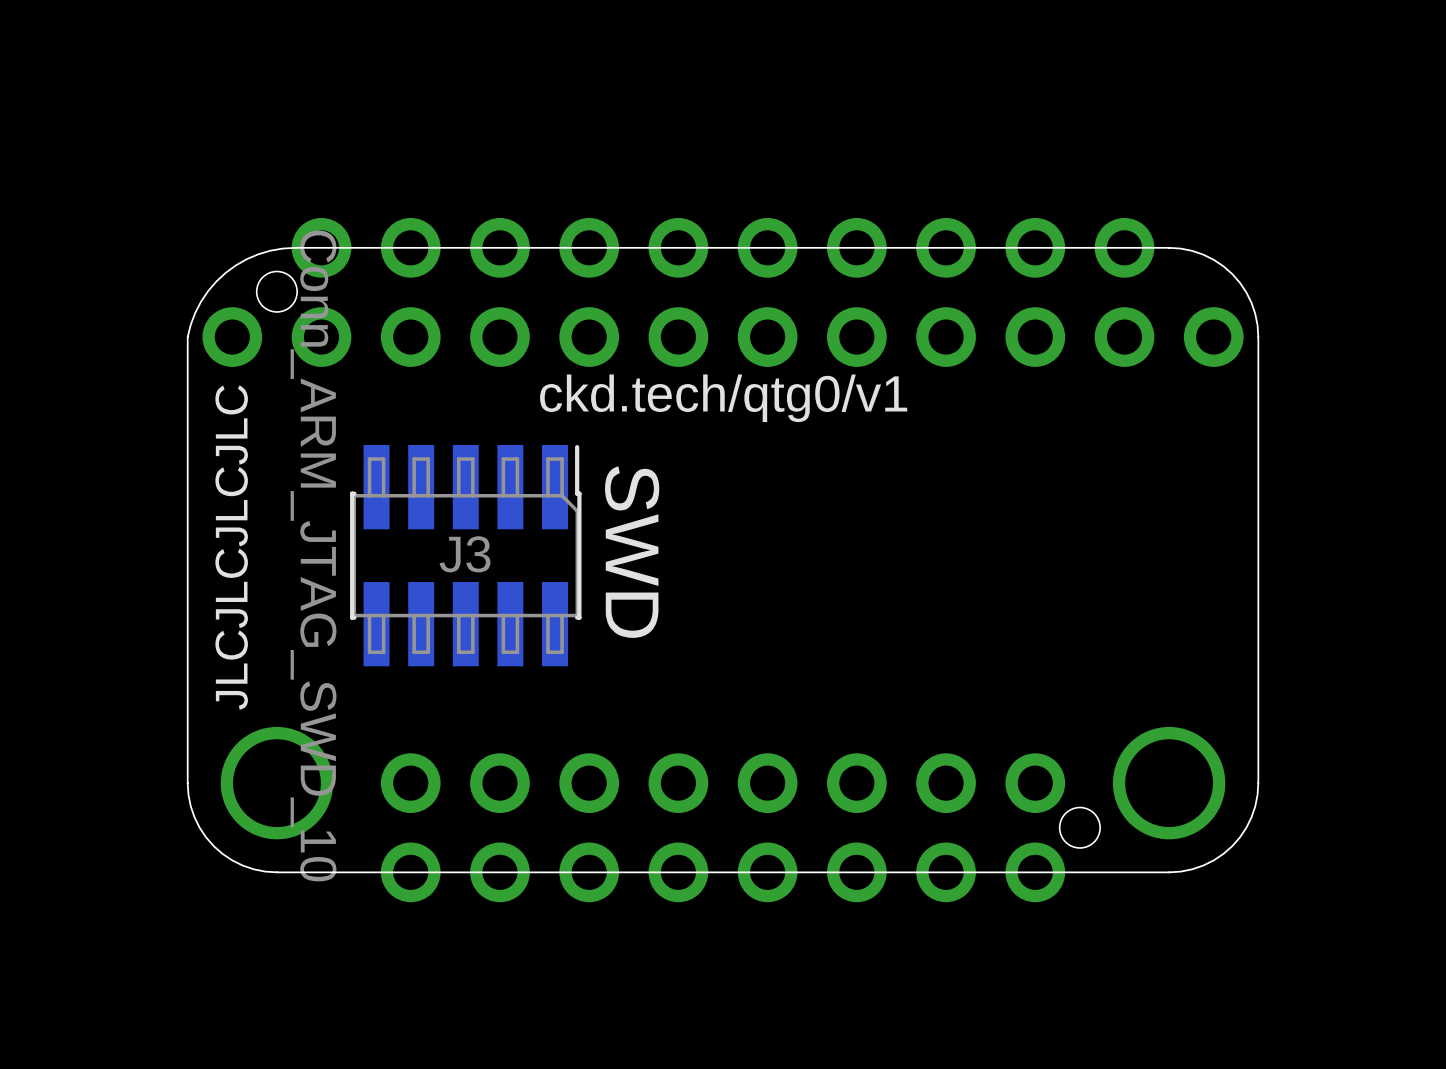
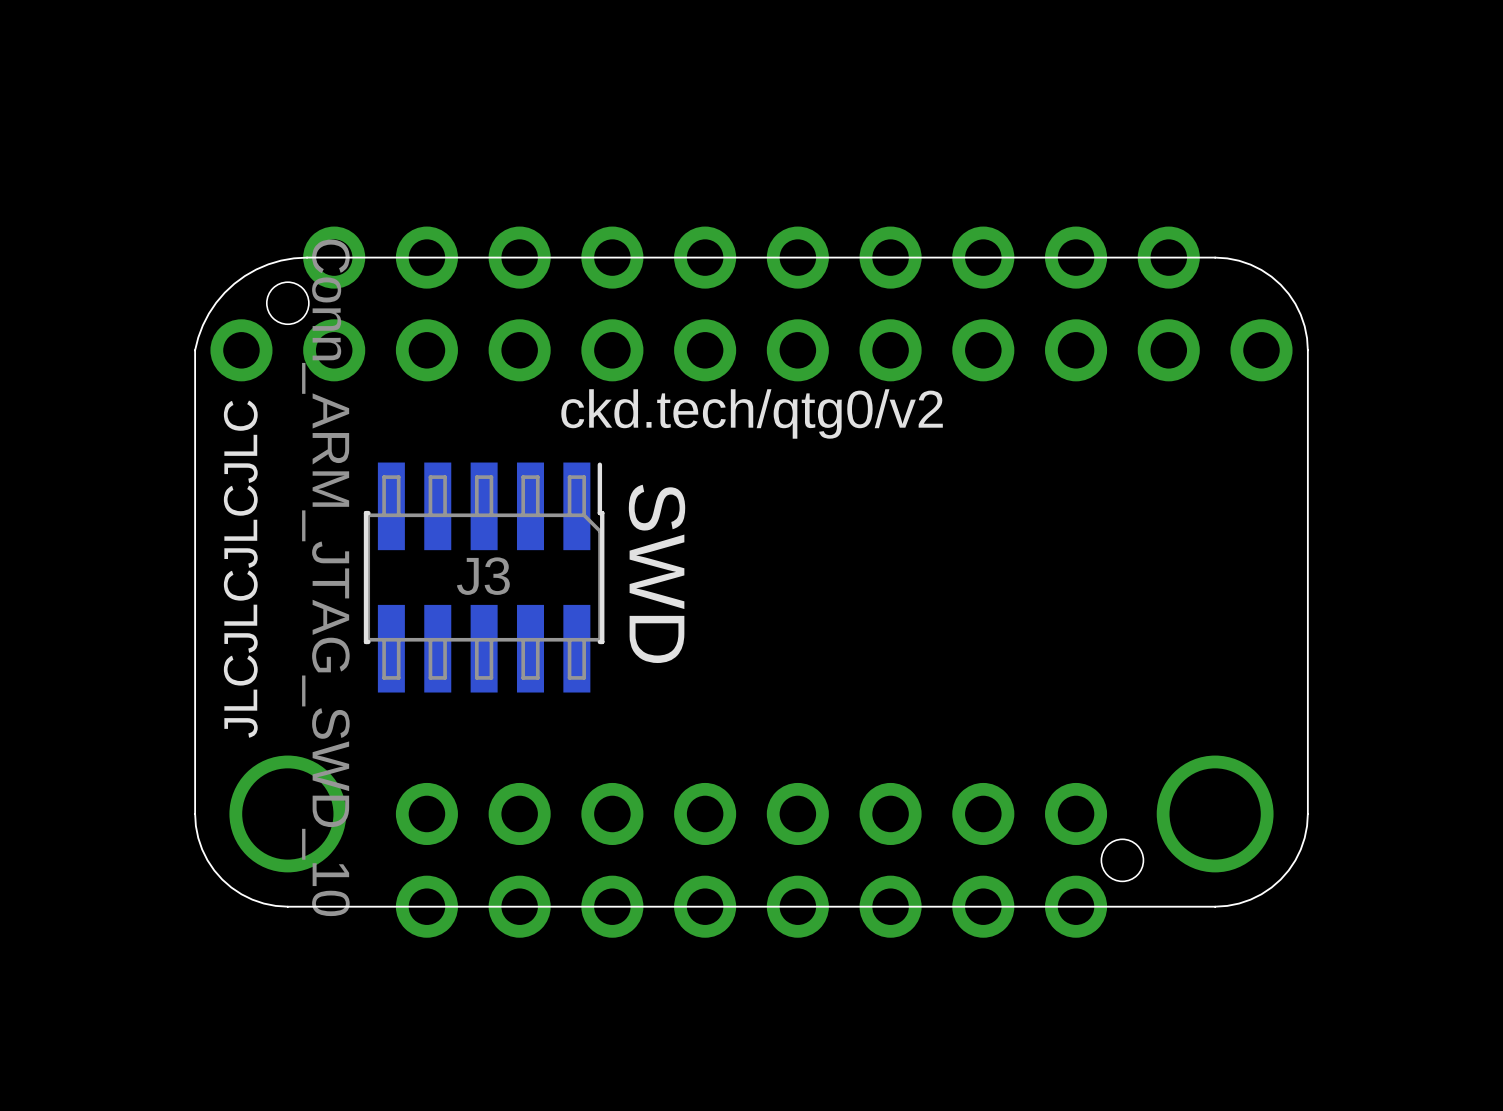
text: ckd.tech/qtg0/v1 (723, 398) -> ckd.tech/qtg0/v2 (752, 413)

